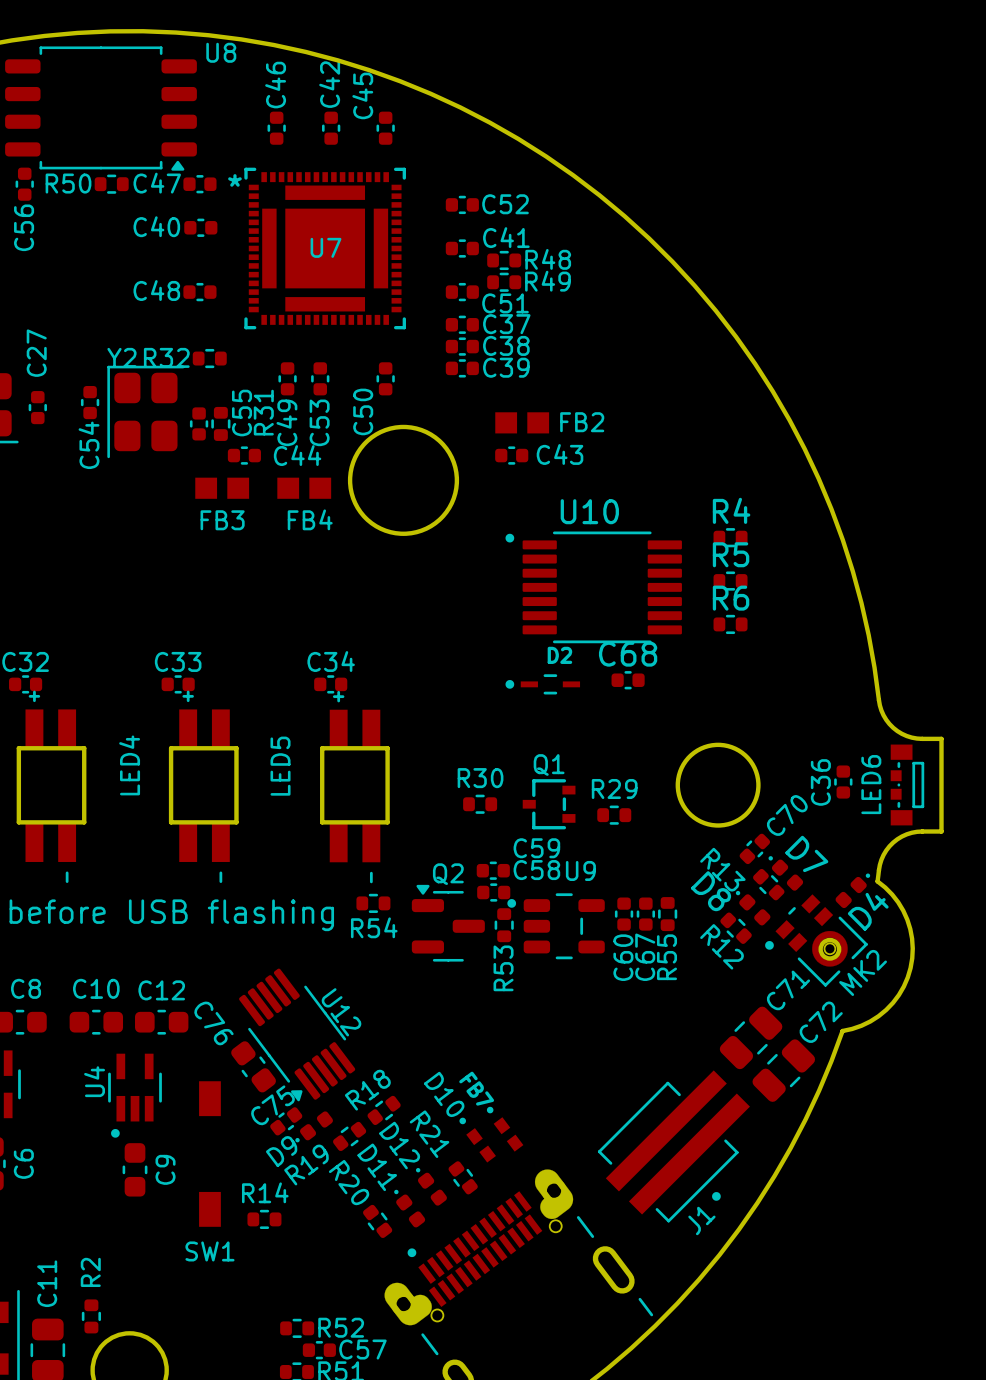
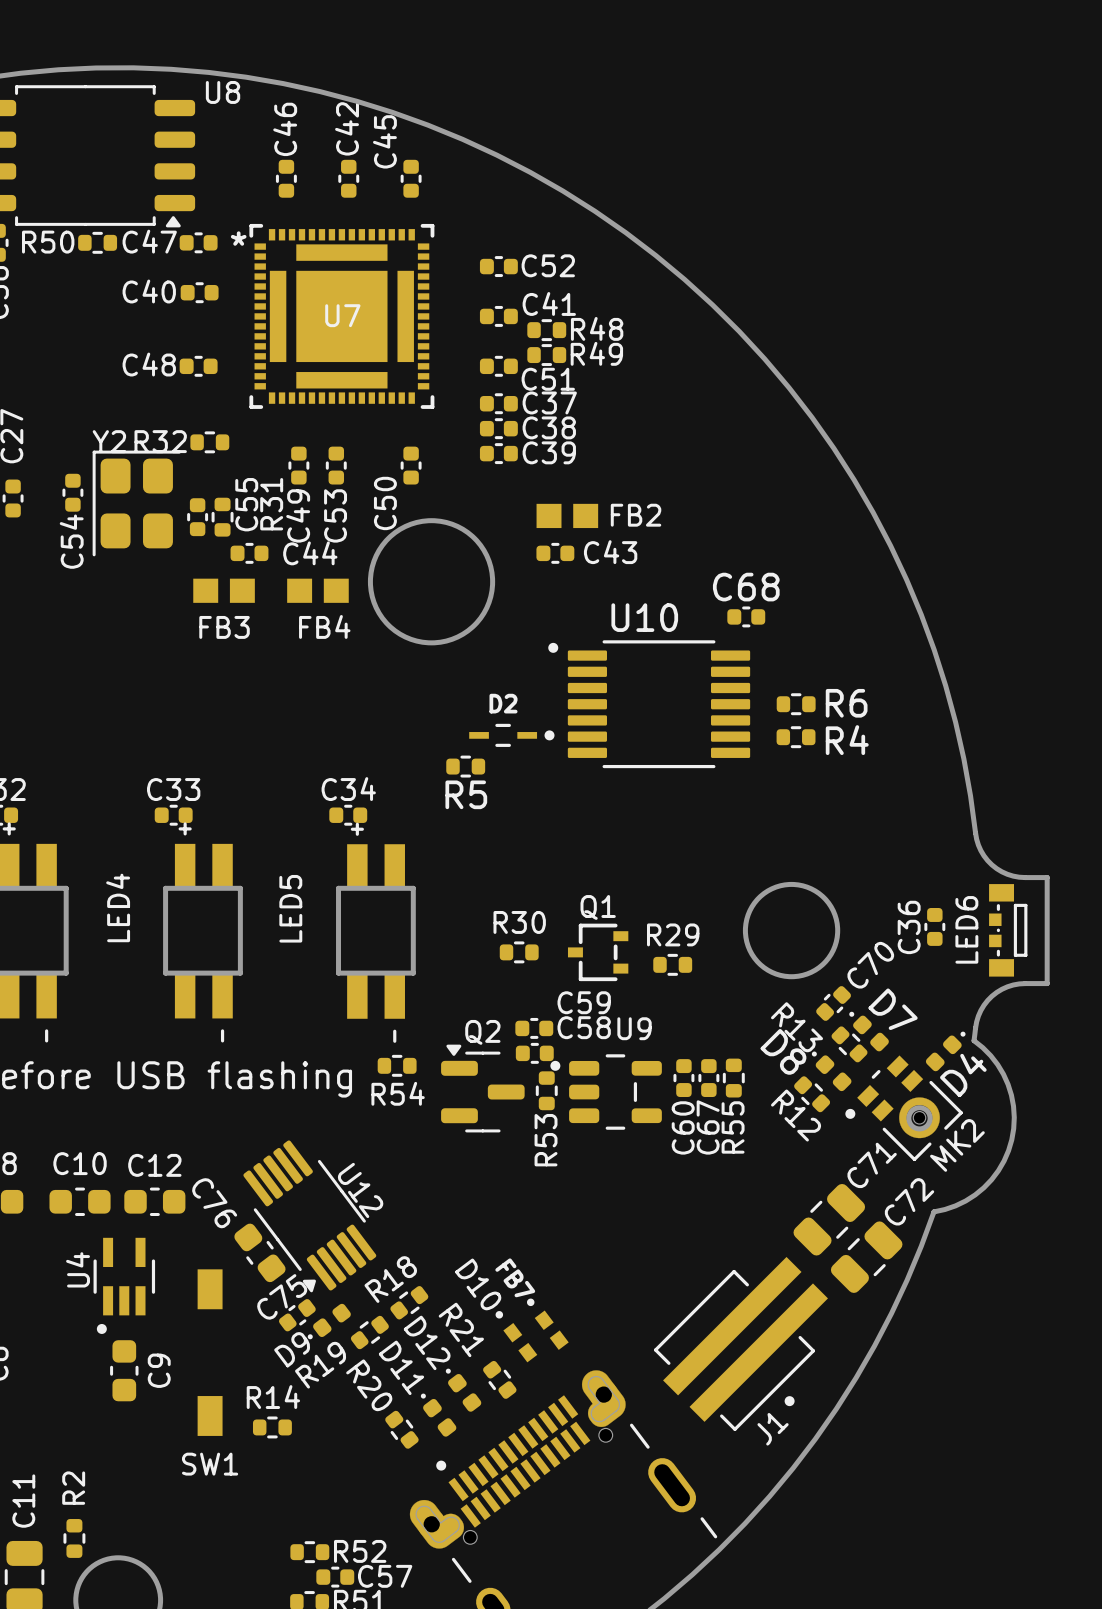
R4 name position: R4 (731, 510) -> R4 (847, 740)
R4 position: (730, 537) -> (796, 737)
R5 name position: R5 (731, 554) -> R5 (466, 794)
R5 position: (730, 581) -> (465, 766)
R6 name position: R6 (731, 598) -> R6 (846, 703)
R6 position: (730, 624) -> (796, 704)
C68 position: (628, 680) -> (746, 616)
D2 rotation: 0° (542, 684) -> 180° (511, 735)
D2 position: (542, 684) -> (511, 735)

